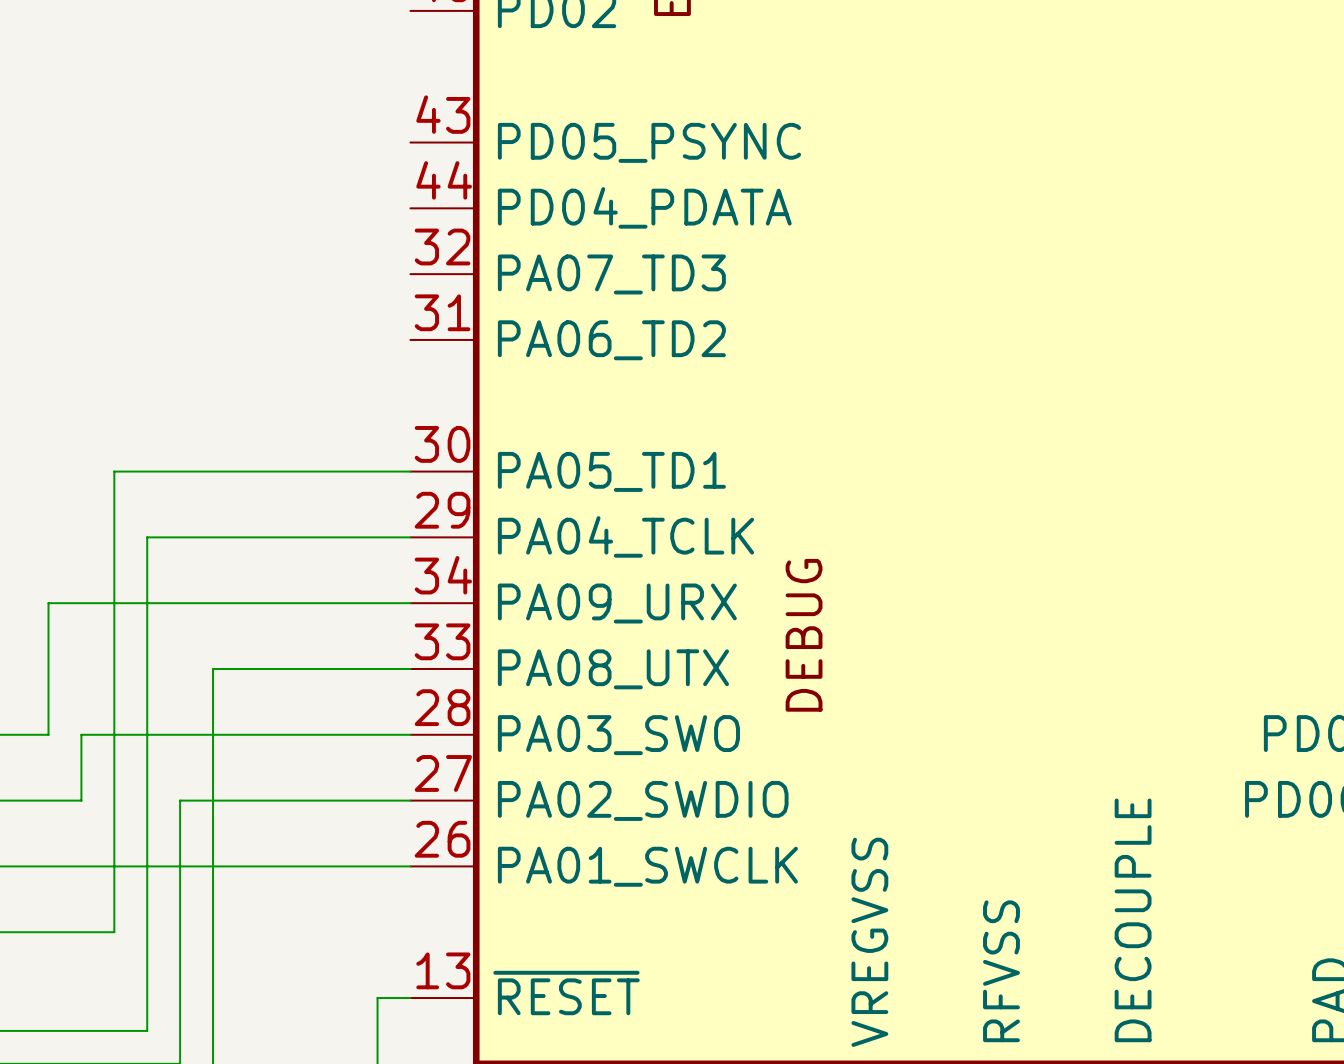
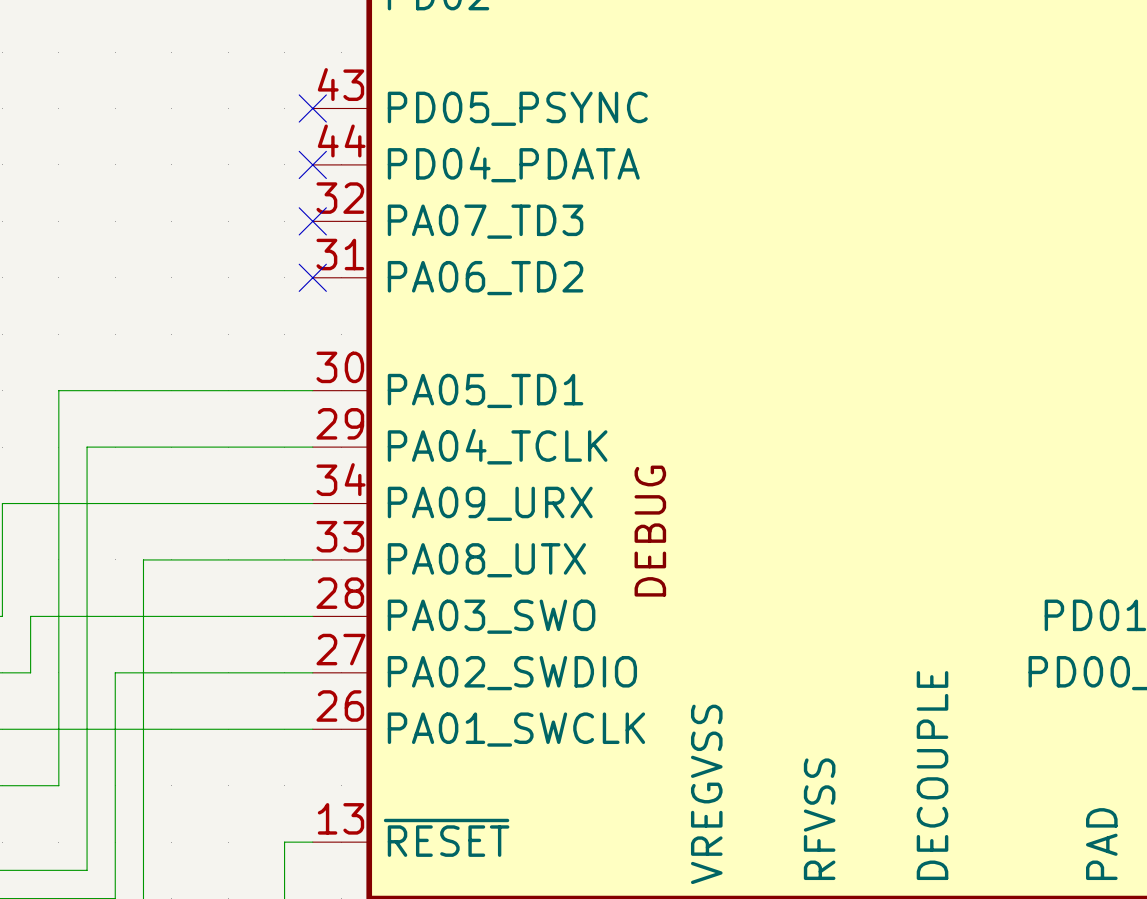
no-connect mark: none -> (312, 108)
no-connect mark: none -> (312, 164)
no-connect mark: none -> (312, 221)
no-connect mark: none -> (312, 277)

